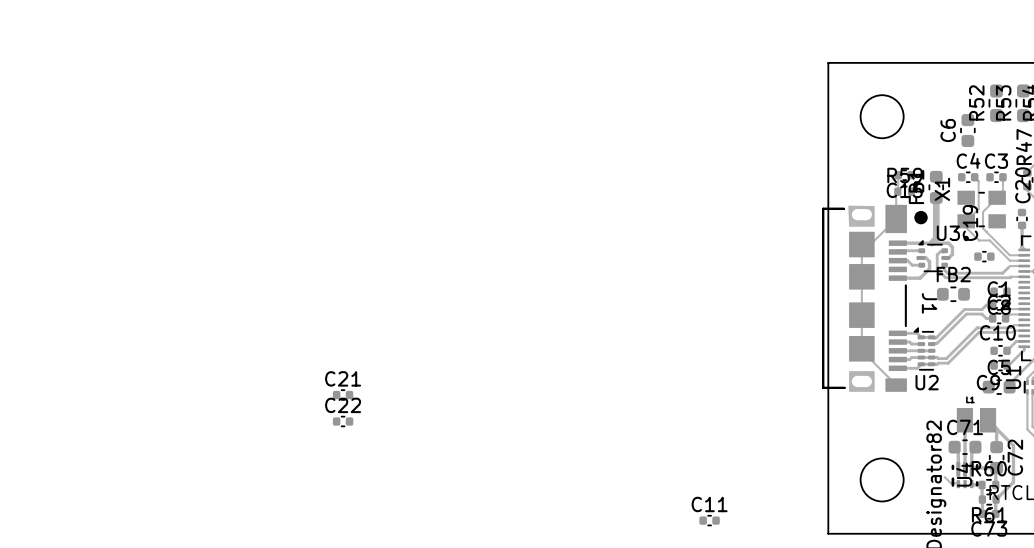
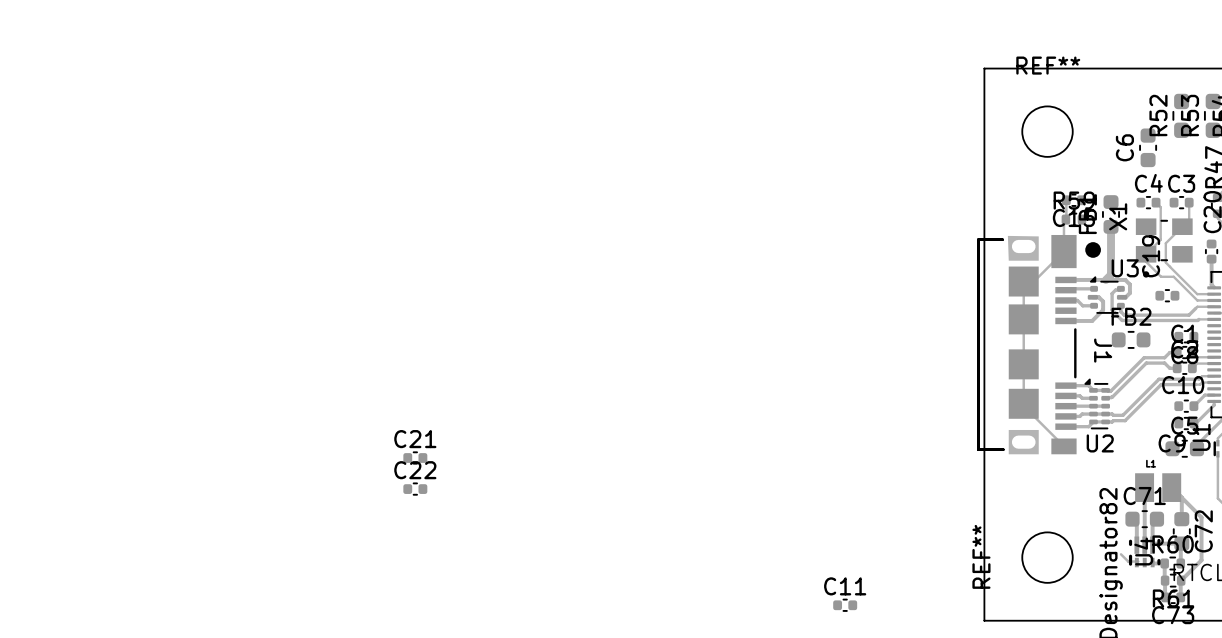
REF** name: none -> REF** (1048, 65)
REF** name: none -> REF** (981, 556)

